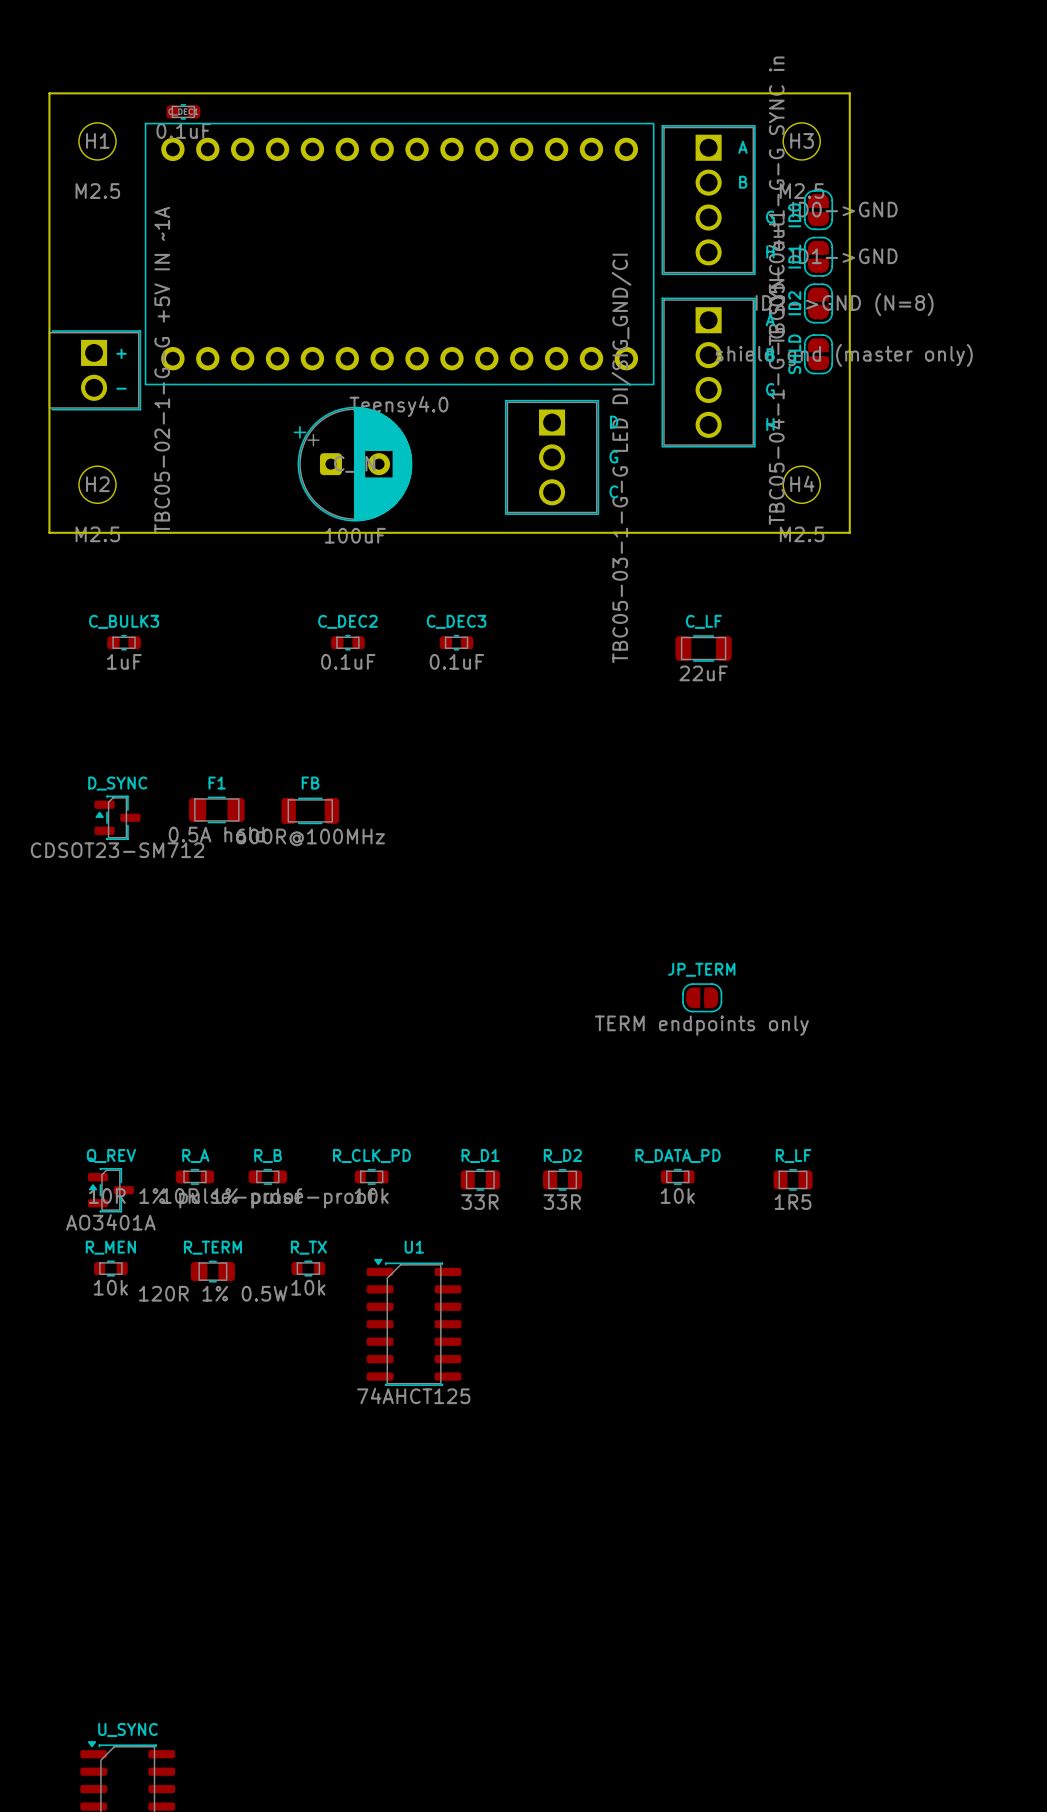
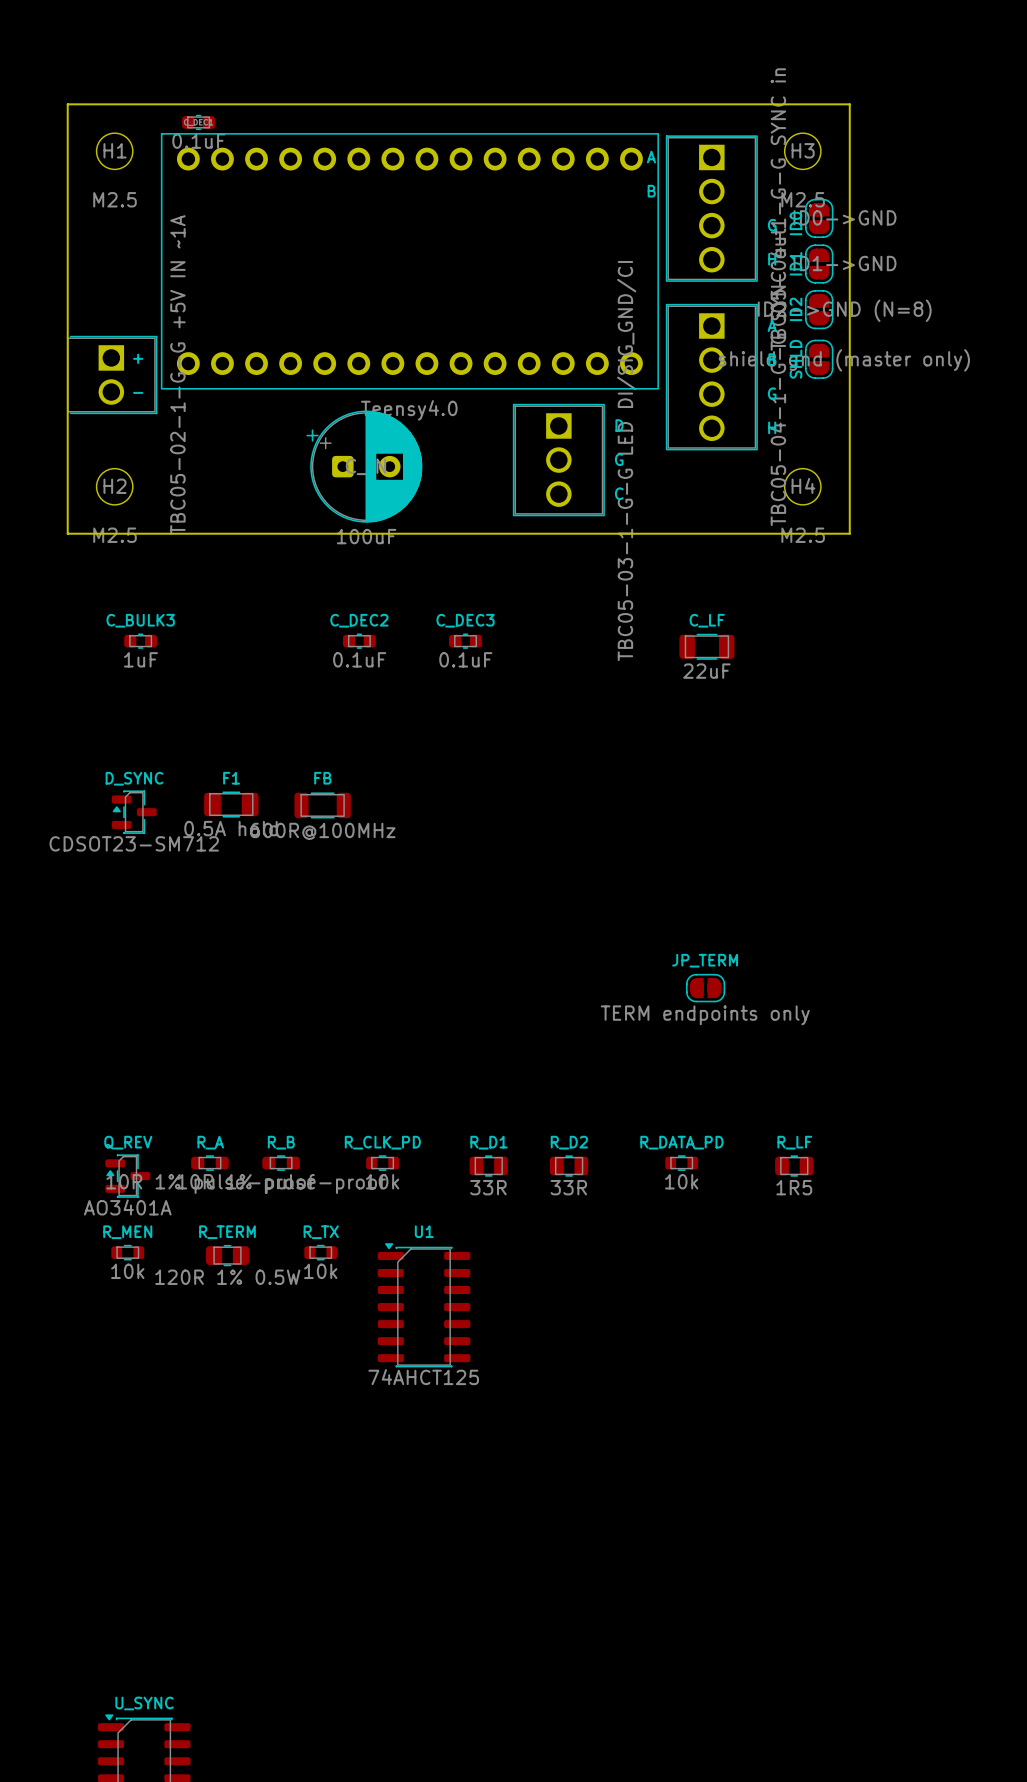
text position: A (742, 147) -> A (651, 157)
text position: B (743, 182) -> B (651, 191)

